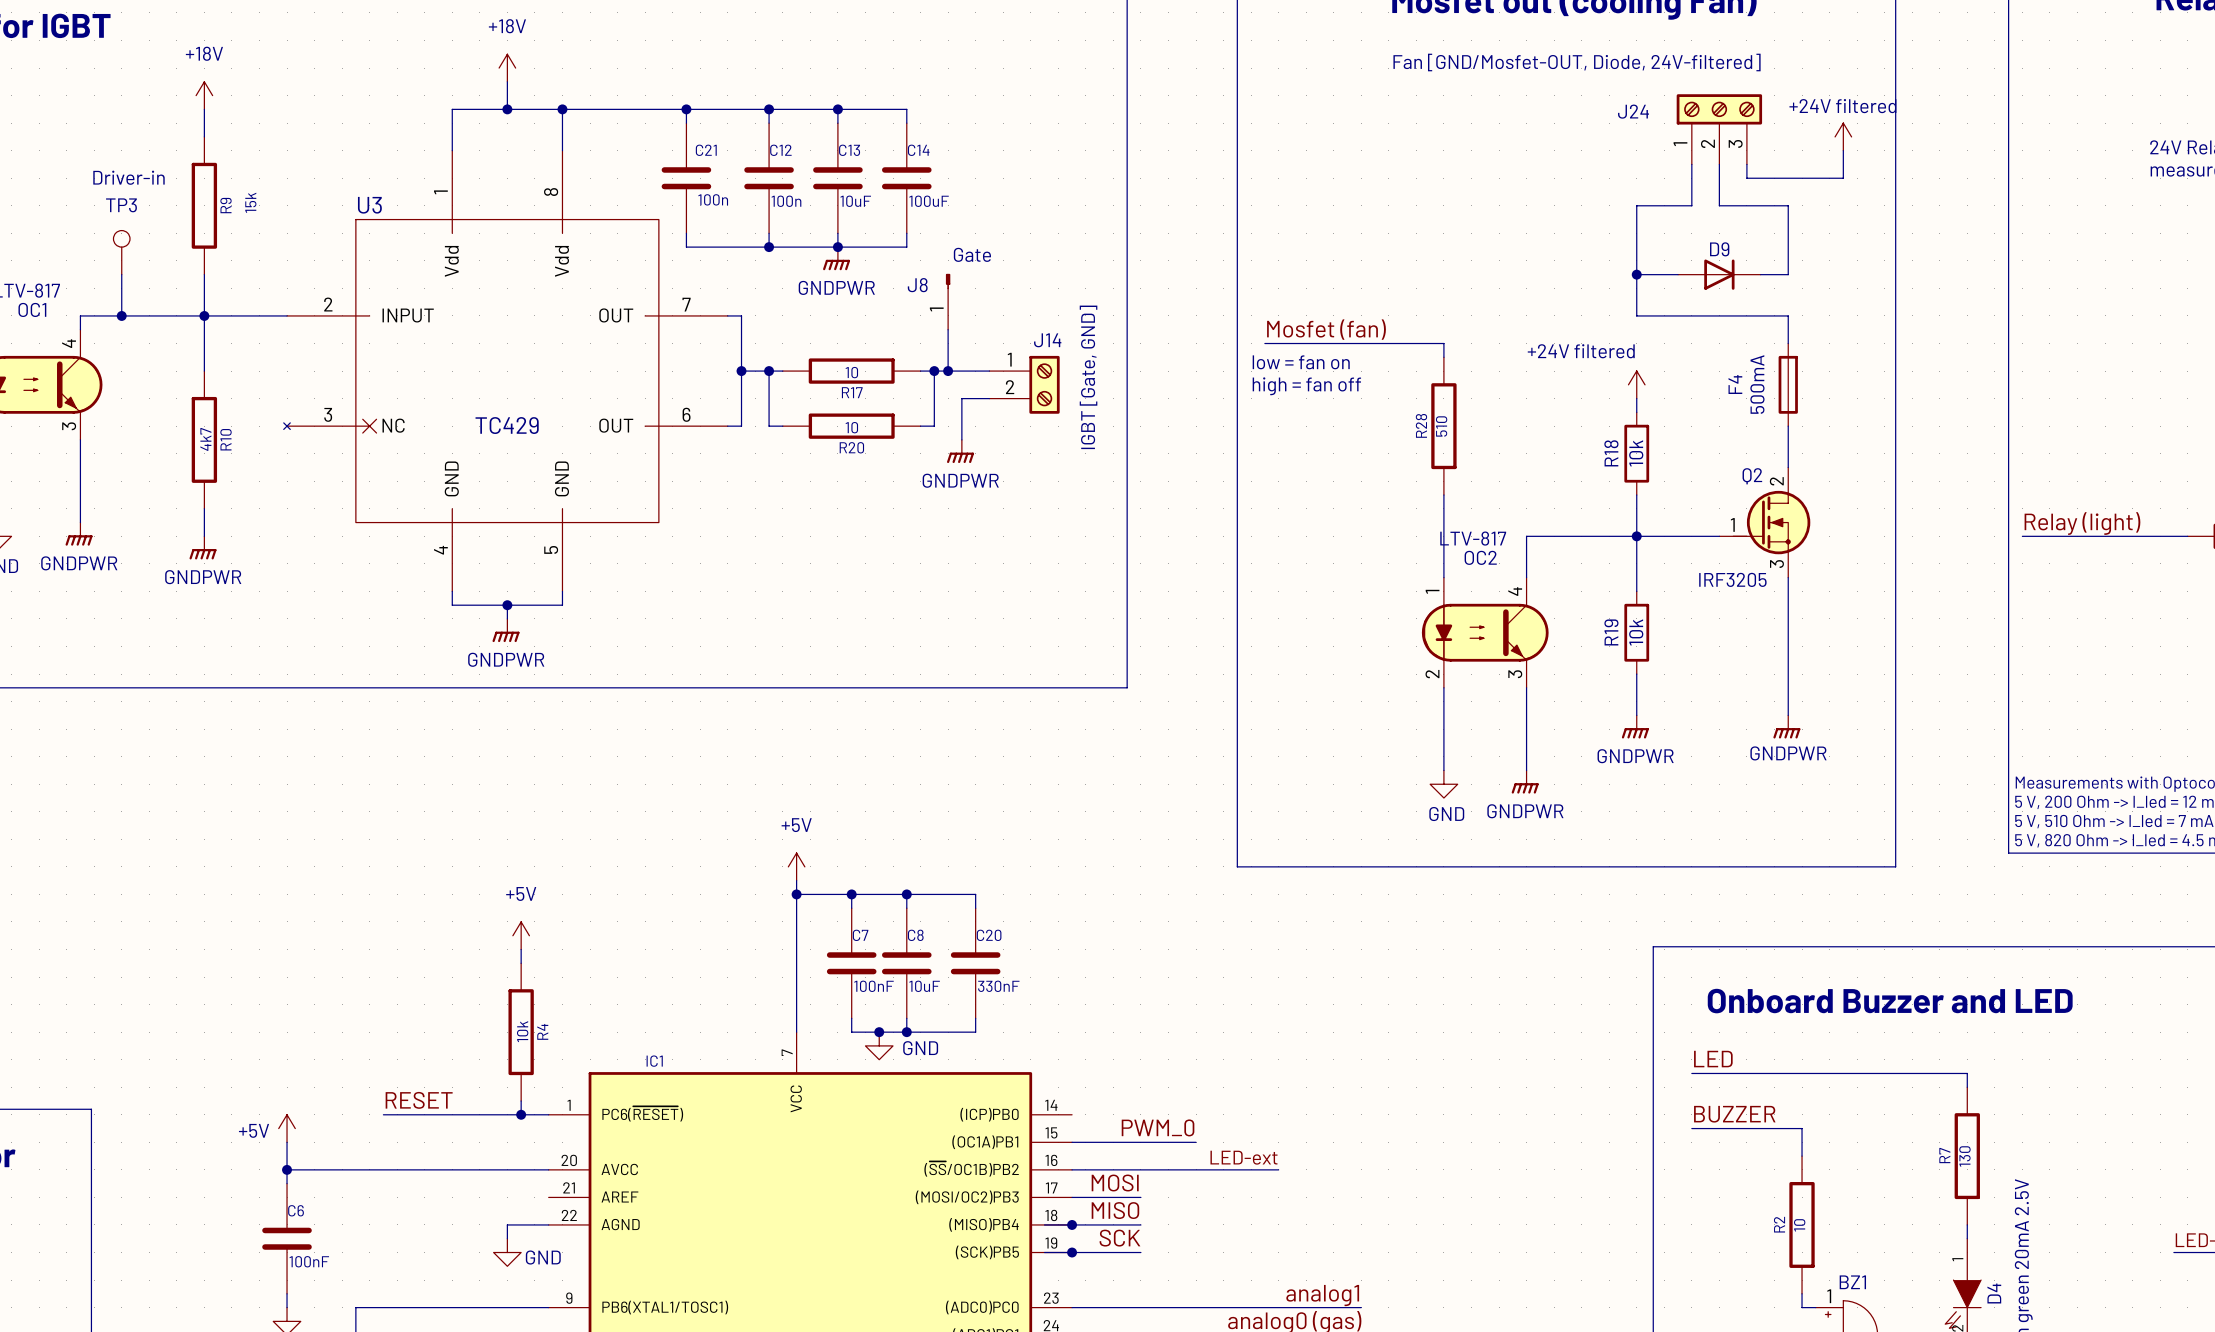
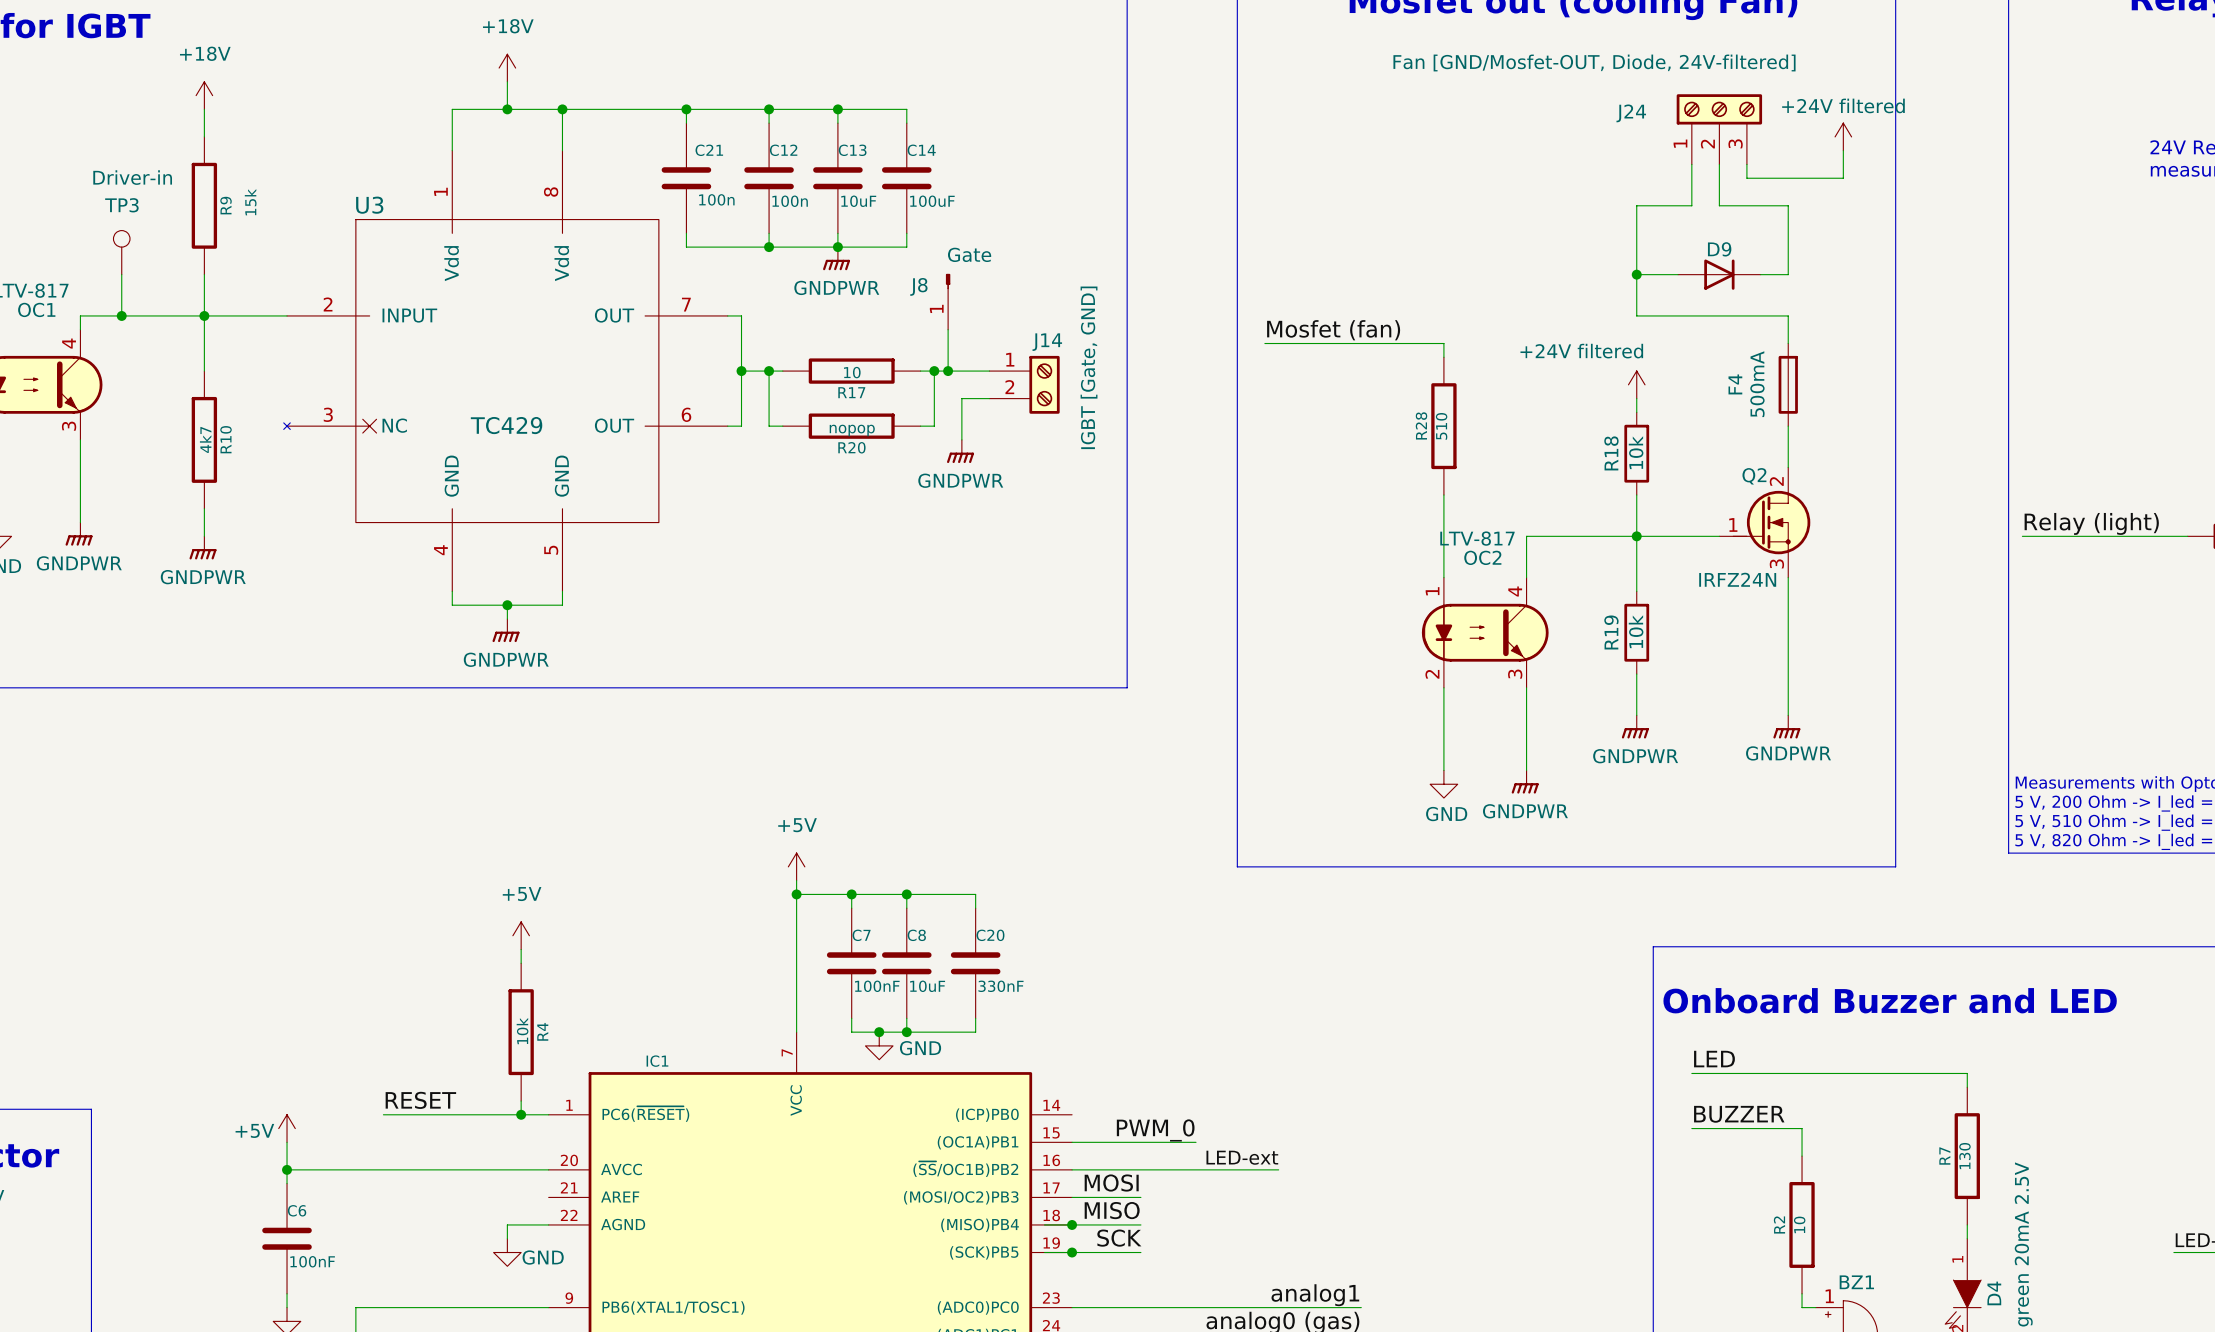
text: low = fan on (1301, 362) -> none
text: high = fan off (1306, 386) -> none
R20 value: 10 (851, 427) -> nopop (852, 430)
Q2 value: IRF3205 (1732, 579) -> IRFZ24N (1737, 579)

